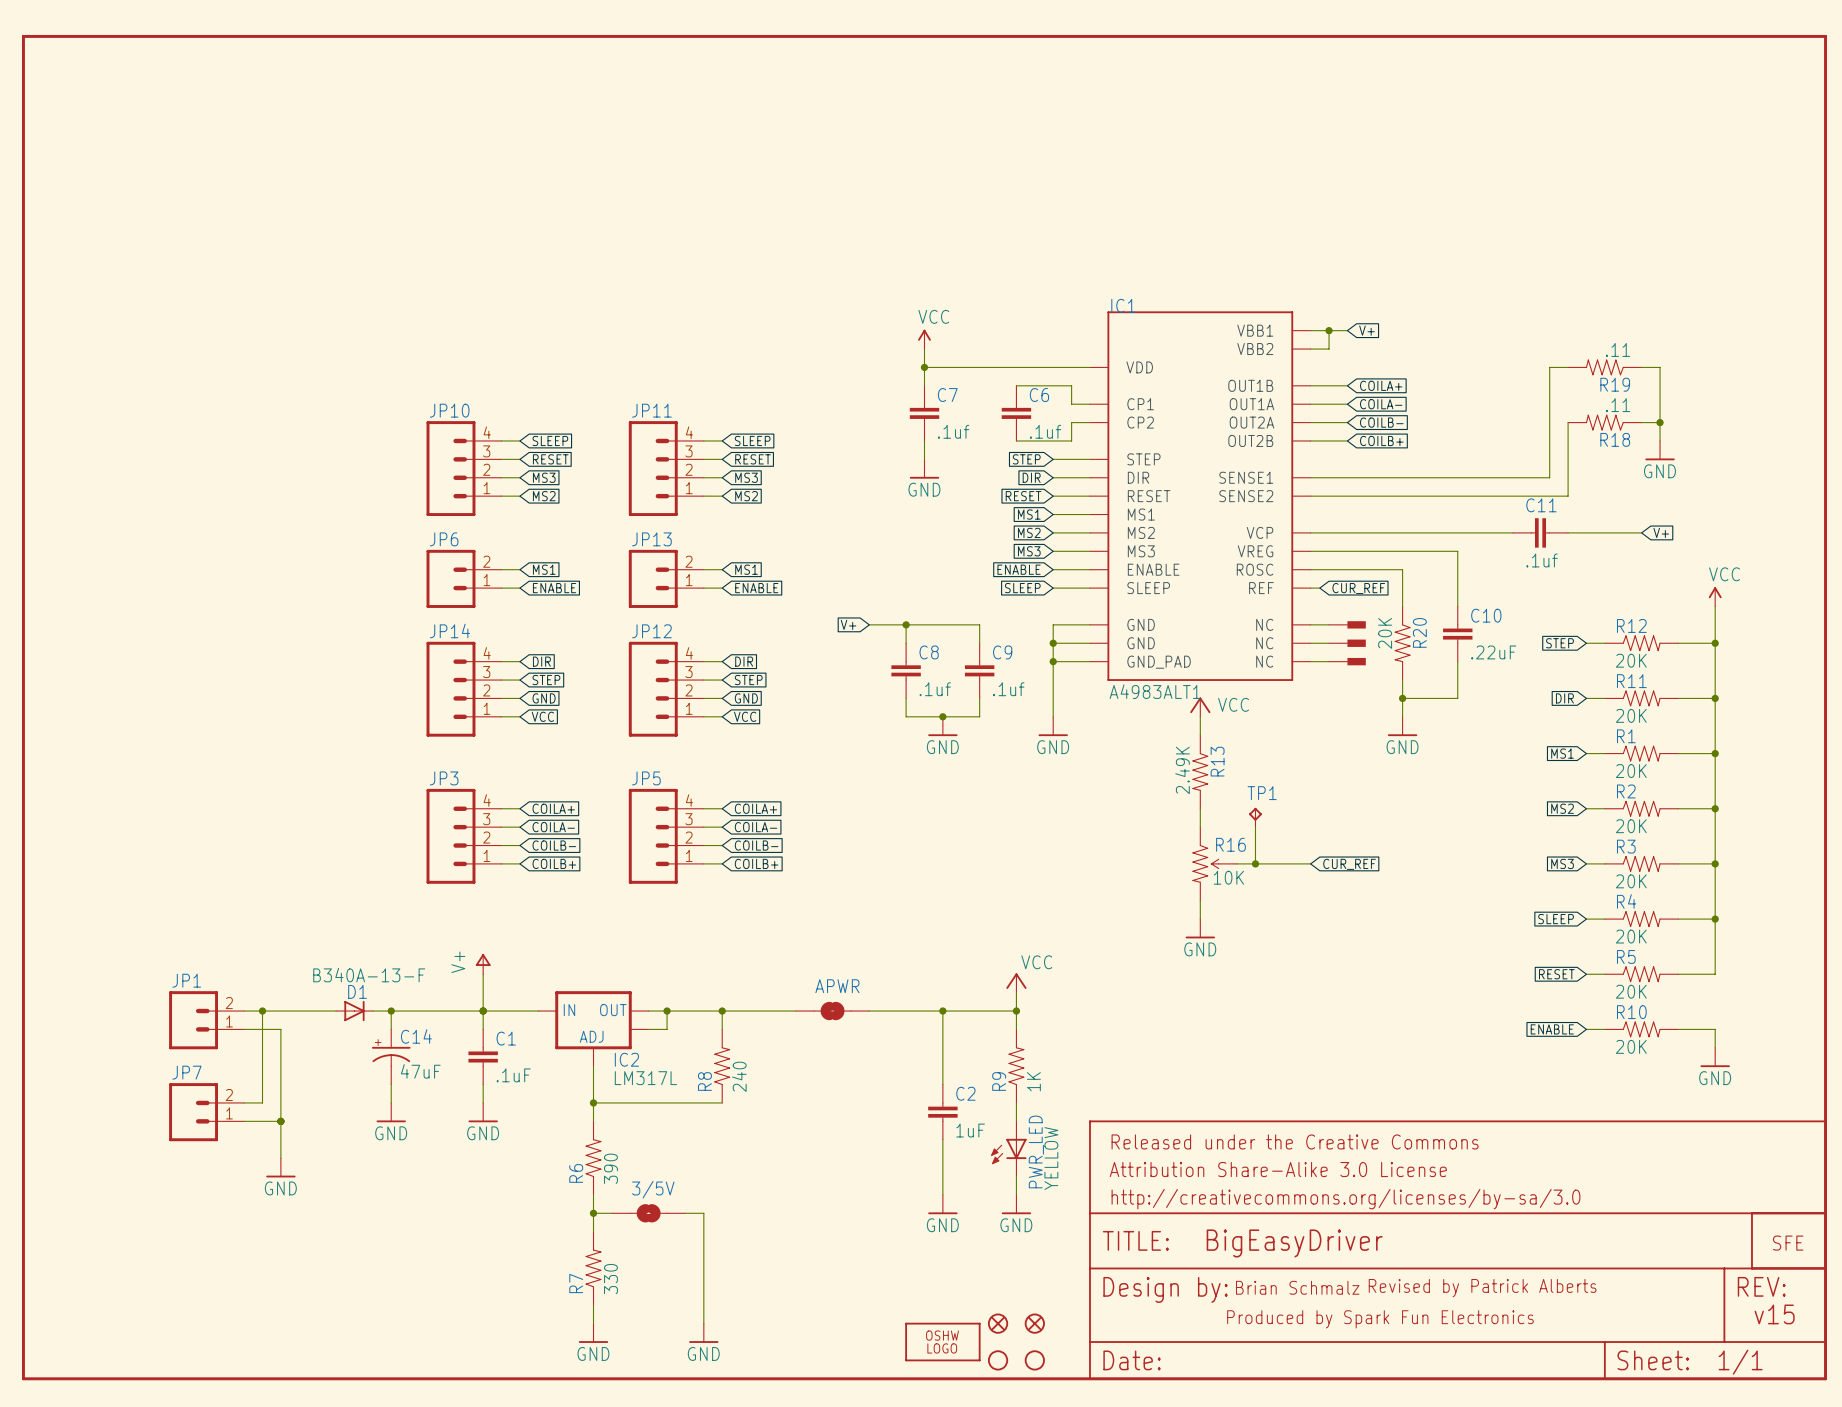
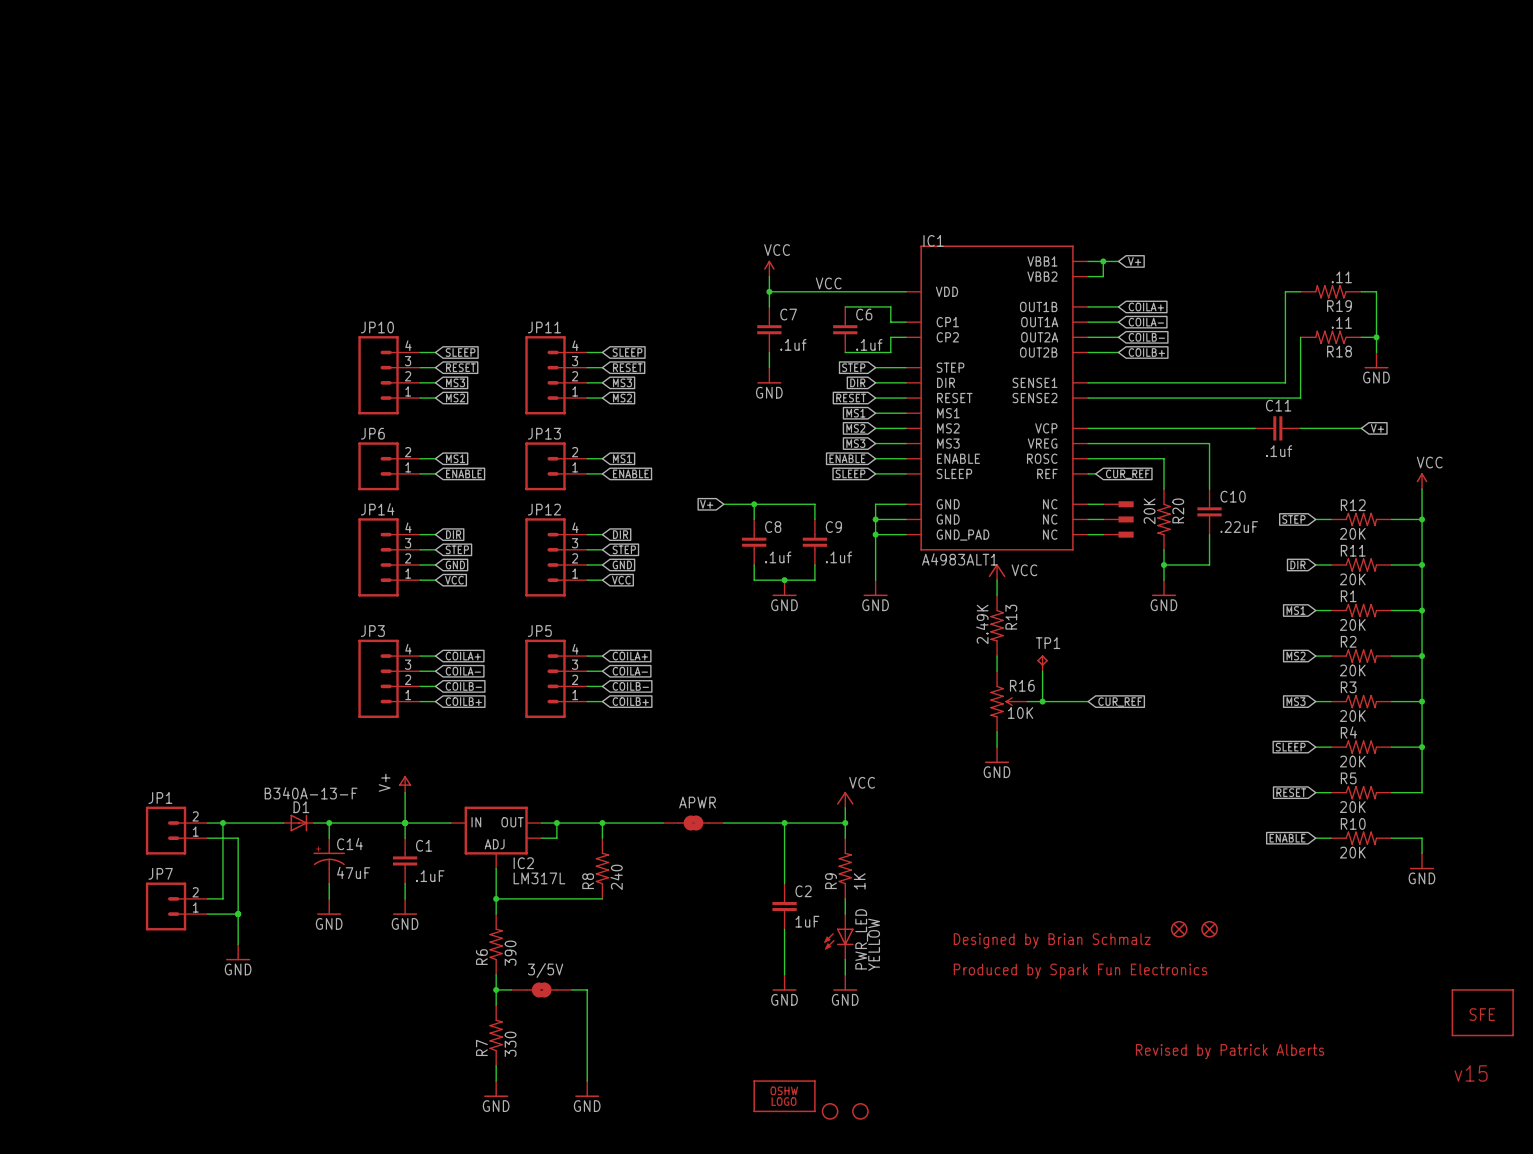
label: none -> VCC (828, 283)
part: (924, 707) -> none
part: none -> (1179, 929)
part: none -> (1209, 929)
text: none -> Designed by Brian Schmalz (1052, 940)
part: (1457, 1250) -> none
text: Brian Schmalz (1297, 1287) -> none
text position: Produced by Spark Fun Electronics (1380, 1319) -> Produced by Spark Fun Electronics (1080, 971)
part: (998, 1323) -> none
part: (1034, 1323) -> none

